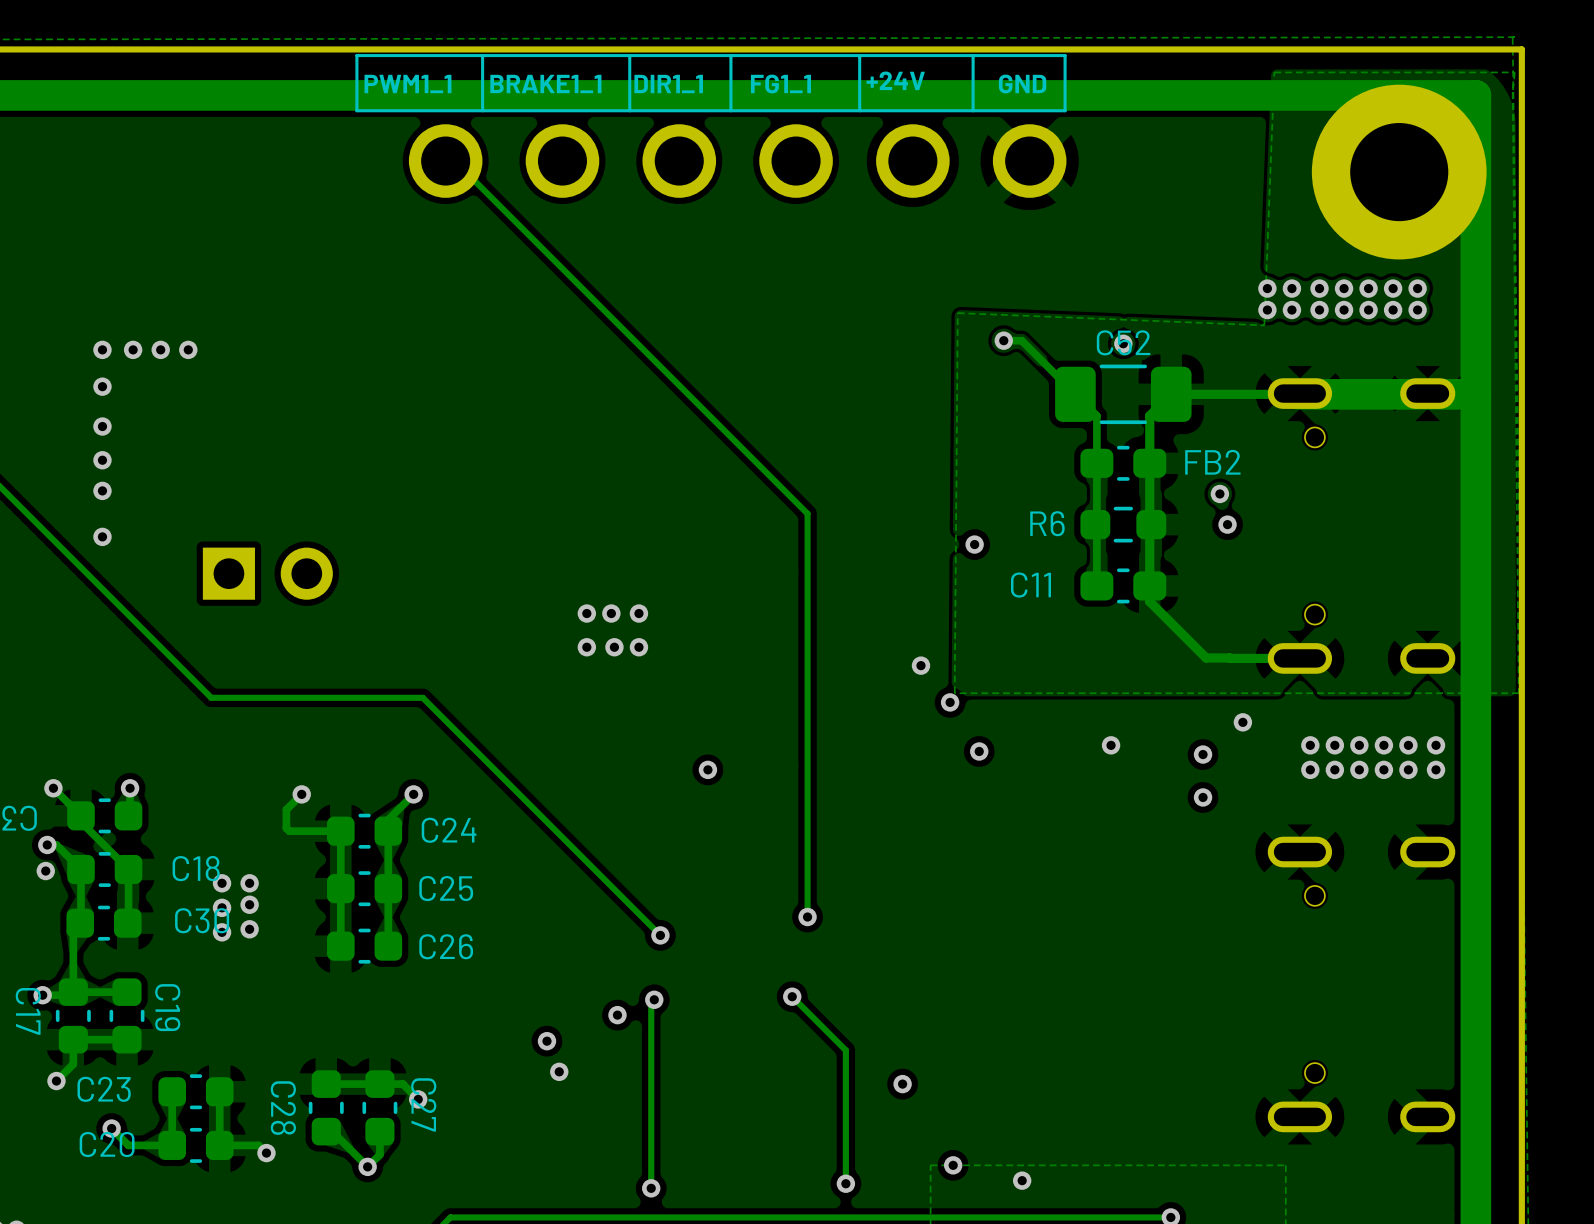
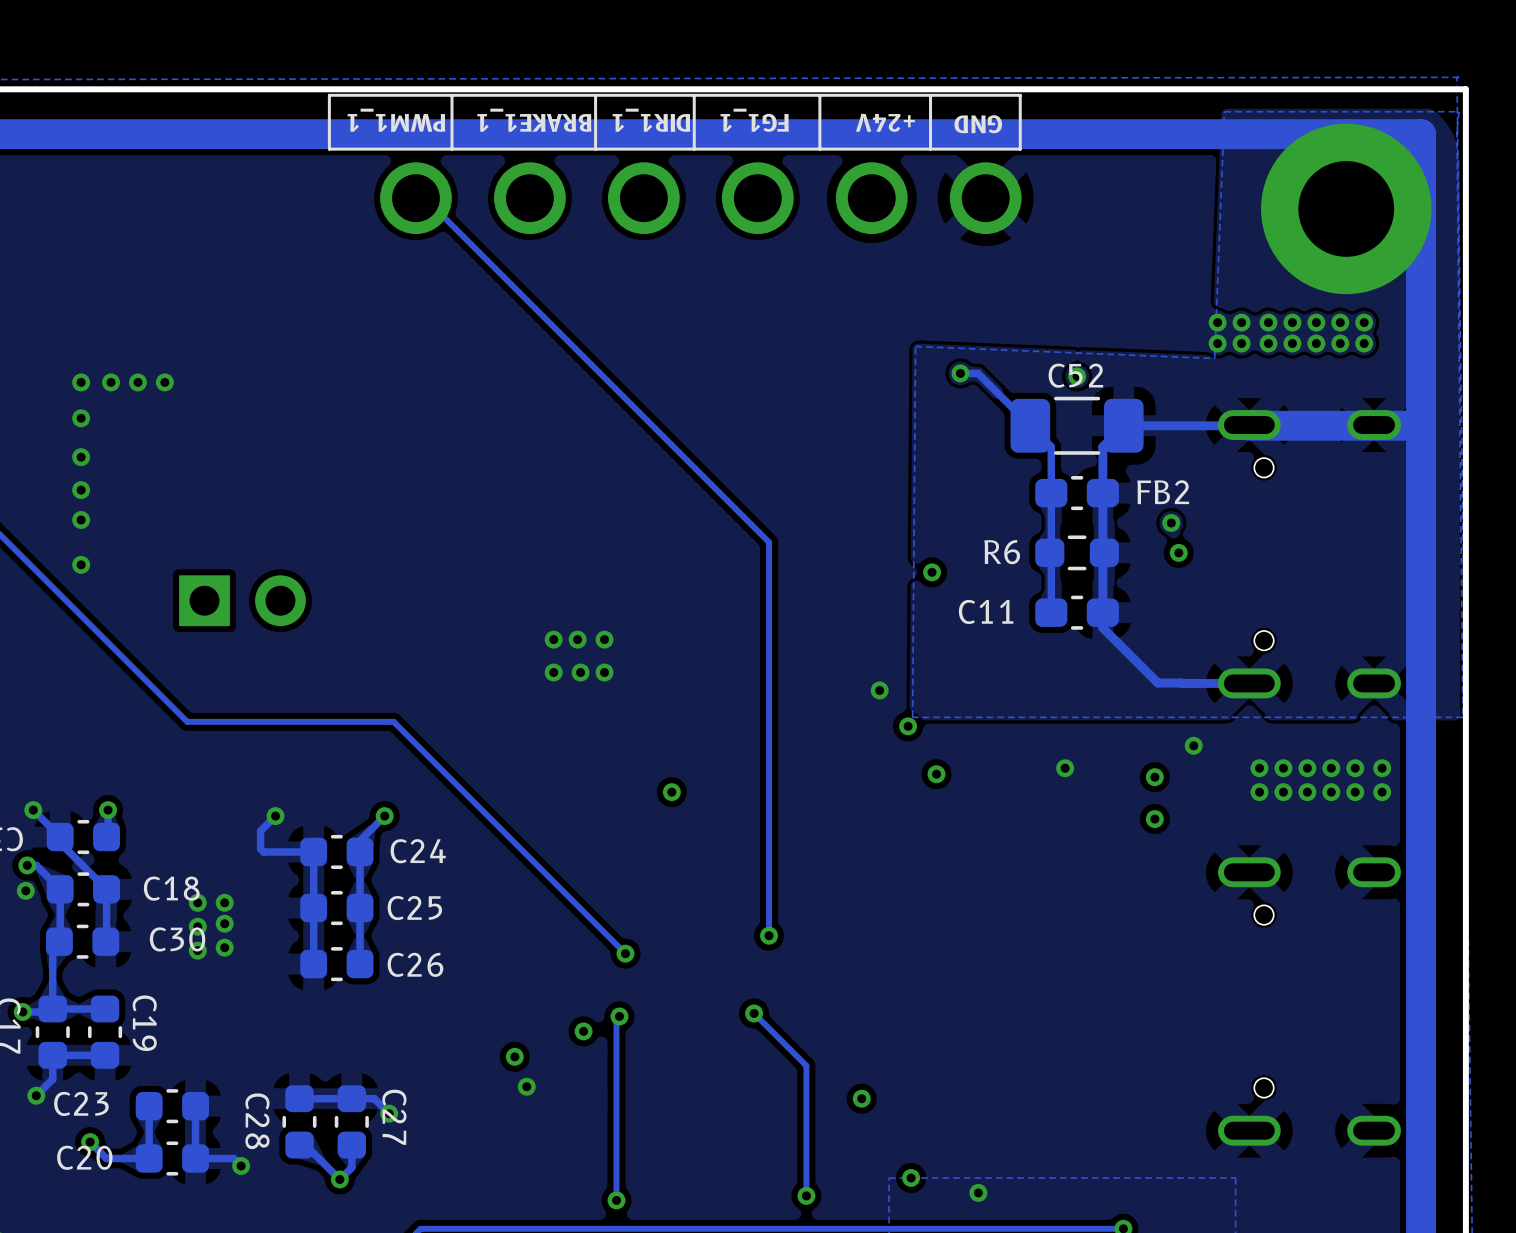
text rotation: 0° (895, 80) -> 180° (885, 122)
text rotation: 0° (407, 83) -> 180° (396, 120)
text rotation: 0° (545, 83) -> 180° (534, 120)
text rotation: 0° (668, 83) -> 180° (651, 120)
text rotation: 0° (780, 83) -> 180° (754, 120)
text rotation: 0° (1022, 83) -> 180° (978, 124)

